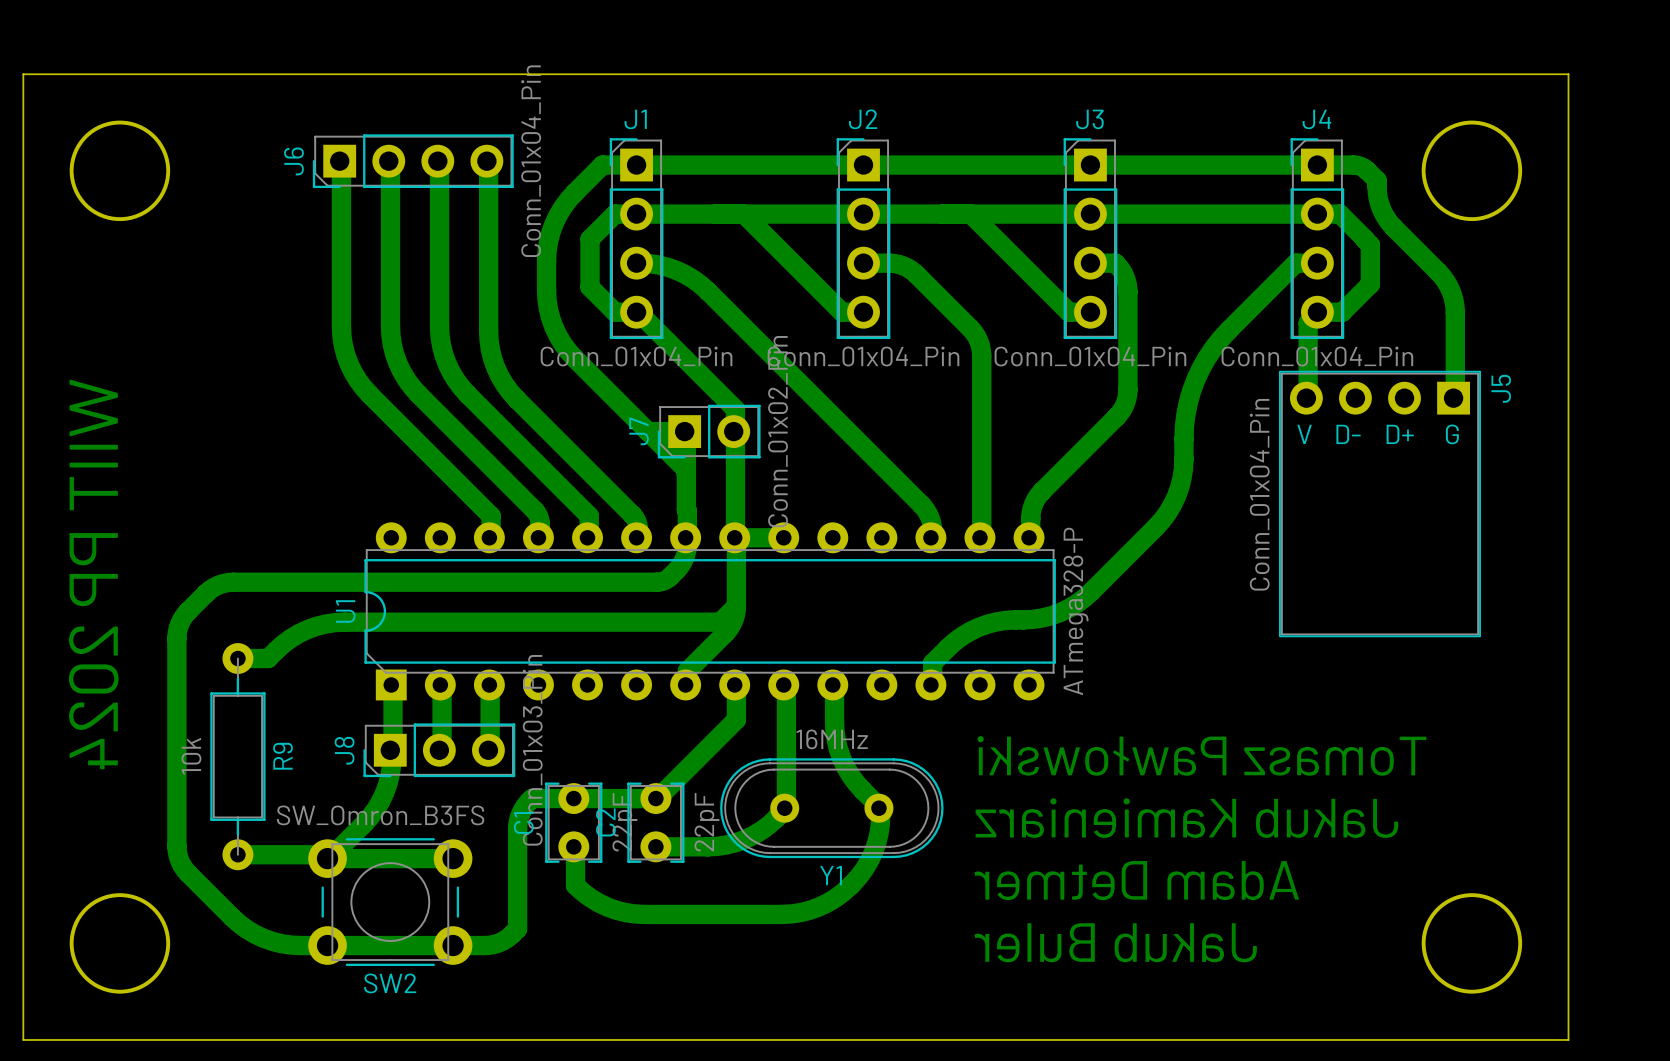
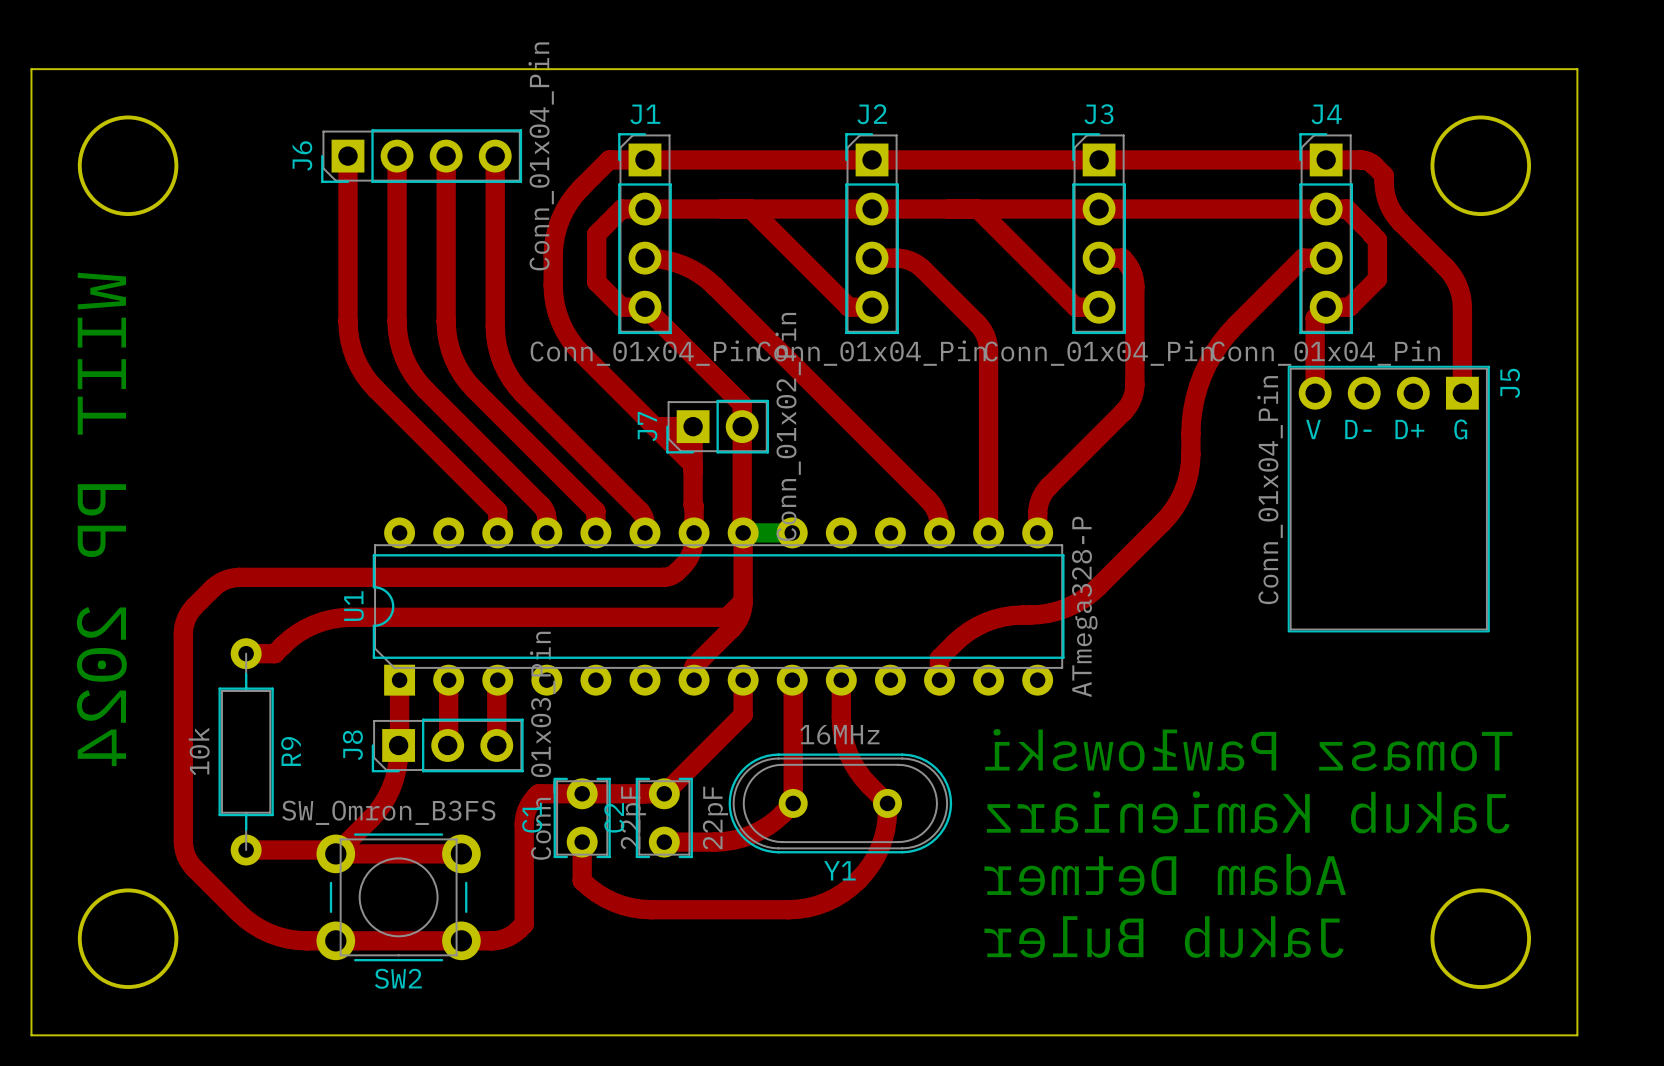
top track: none -> (347, 156) (347, 321) (349, 340) (355, 358) (364, 374) (376, 389) (497, 511) (496, 531)
bottom track: (341, 161) (341, 326) (343, 345) (348, 363) (357, 379) (369, 394) (491, 515) (490, 536) -> none
top track: none -> (397, 156) (397, 321) (398, 340) (404, 358) (413, 374) (425, 389) (542, 506) (546, 517) (545, 531)
bottom track: (390, 161) (390, 326) (392, 345) (397, 363) (406, 379) (418, 394) (535, 511) (540, 522) (539, 536) -> none
top track: none -> (446, 156) (446, 321) (448, 340) (453, 358) (462, 374) (474, 389) (595, 511) (594, 531)
bottom track: (439, 161) (439, 326) (441, 345) (446, 363) (455, 379) (467, 394) (589, 515) (588, 536) -> none
top track: none -> (495, 156) (495, 326) (497, 345) (502, 363) (511, 379) (523, 394) (640, 511) (644, 520) (644, 531)
bottom track: (488, 161) (488, 331) (490, 349) (495, 368) (504, 384) (516, 399) (633, 516) (637, 525) (637, 536) -> none
top track: none -> (750, 209) (848, 307) (872, 307)
bottom track: (743, 214) (842, 312) (865, 312) -> none
top track: none -> (977, 209) (1075, 307) (1099, 307)
bottom track: (970, 214) (1068, 312) (1092, 312) -> none
top track: none -> (644, 258) (665, 259) (683, 265) (700, 274) (714, 286) (928, 499) (937, 515) (939, 532)
bottom track: (638, 263) (658, 265) (676, 270) (693, 279) (708, 291) (921, 504) (930, 520) (932, 537) -> none
top track: none -> (872, 258) (901, 258) (919, 266) (977, 323) (985, 335) (988, 350) (988, 532)
bottom track: (865, 263) (894, 263) (912, 271) (970, 328) (978, 340) (981, 355) (981, 537) -> none
top track: none -> (1099, 258) (1122, 258) (1133, 275) (1134, 286) (1134, 392) (1126, 409) (1045, 490) (1037, 508) (1037, 532)
bottom track: (1092, 263) (1115, 263) (1126, 280) (1127, 291) (1127, 397) (1119, 414) (1038, 495) (1031, 513) (1030, 537) -> none
top track: none -> (1326, 258) (1302, 258) (1236, 324) (1213, 353) (1202, 375) (1195, 398) (1191, 422) (1190, 463) (1186, 482) (1179, 499) (1168, 515) (1098, 586) (1075, 603) (1048, 613) (1013, 615) (994, 619) (977, 626) (961, 636) (939, 658) (939, 686)
bottom track: (1319, 263) (1295, 263) (1229, 329) (1206, 358) (1195, 380) (1188, 403) (1184, 427) (1183, 468) (1179, 487) (1172, 504) (1162, 520) (1091, 591) (1068, 608) (1042, 618) (1006, 620) (987, 624) (970, 631) (954, 641) (932, 663) (932, 690) -> none
top track: none -> (1315, 393) (1315, 318) (1326, 307) (1349, 307) (1377, 279) (1377, 240) (1347, 209) (621, 209) (596, 234) (596, 282) (621, 307) (644, 307) (742, 404) (743, 601)
bottom track: (1308, 398) (1308, 323) (1319, 312) (1342, 312) (1370, 284) (1370, 245) (1339, 214) (615, 214) (590, 239) (590, 287) (615, 312) (638, 312) (735, 409) (736, 606) -> none
top track: none -> (1462, 393) (1462, 308) (1457, 285) (1449, 271) (1393, 213) (1386, 198) (1384, 175) (1366, 160) (609, 159) (575, 194) (564, 210) (557, 227) (553, 246) (553, 285) (557, 313) (564, 330) (575, 346) (693, 465)
bottom track: (1455, 398) (1455, 313) (1450, 290) (1442, 276) (1386, 219) (1379, 203) (1377, 180) (1359, 165) (602, 165) (568, 199) (557, 215) (550, 233) (546, 261) (547, 299) (550, 318) (557, 335) (568, 351) (686, 470) -> none
top track: none -> (654, 426) (693, 426) (693, 546) (685, 563) (670, 575) (239, 577) (224, 580) (212, 588) (189, 612) (183, 629) (183, 841) (186, 856) (194, 868) (245, 918) (261, 929) (278, 936) (306, 940) (491, 940) (502, 939) (513, 934) (524, 924) (524, 820) (528, 806) (535, 796) (538, 793) (664, 793) (743, 714) (743, 680)
bottom track: (647, 431) (686, 431) (686, 551) (678, 568) (664, 580) (233, 582) (218, 585) (205, 593) (183, 617) (177, 634) (176, 846) (179, 860) (188, 873) (239, 923) (254, 934) (272, 941) (300, 945) (484, 945) (496, 943) (506, 939) (517, 928) (517, 825) (522, 810) (528, 801) (532, 798) (657, 798) (736, 719) (736, 684) -> none
top track: none -> (743, 601) (727, 617) (341, 617) (323, 621) (305, 628) (289, 639) (274, 653) (246, 653)
top track: none -> (743, 601) (741, 612) (734, 625) (694, 666) (694, 680)
bottom track: (736, 606) (720, 622) (335, 622) (316, 626) (299, 633) (283, 644) (268, 658) (239, 658) -> none
bottom track: (736, 606) (733, 620) (727, 630) (687, 671) (687, 684) -> none
top track: none -> (399, 680) (399, 744) (396, 769) (391, 788) (376, 812) (335, 853)
bottom track: (393, 684) (393, 749) (390, 774) (384, 792) (370, 817) (329, 858) -> none
top track: none -> (448, 680) (447, 745)
bottom track: (442, 684) (441, 750) -> none
top track: none -> (497, 680) (496, 745)
bottom track: (491, 684) (490, 750) -> none
top track: none -> (792, 680) (793, 803) (768, 825) (742, 837) (724, 841) (664, 842)
bottom track: (785, 684) (786, 808) (761, 830) (735, 842) (717, 846) (657, 846) -> none
top track: none -> (841, 680) (841, 726) (848, 754) (863, 778) (887, 803) (885, 829) (876, 856) (859, 879) (842, 893) (816, 905) (798, 909) (651, 909) (632, 907) (605, 898) (582, 880) (582, 842)
bottom track: (834, 684) (835, 731) (841, 759) (856, 783) (880, 808) (878, 834) (869, 861) (852, 883) (835, 898) (809, 910) (791, 913) (644, 914) (625, 912) (598, 903) (575, 885) (575, 846) -> none
top track: none -> (246, 850) (331, 850) (335, 853)
bottom track: (239, 854) (325, 854) (329, 858) -> none
top track: none -> (335, 853) (461, 853)
bottom track: (329, 858) (454, 858) -> none

